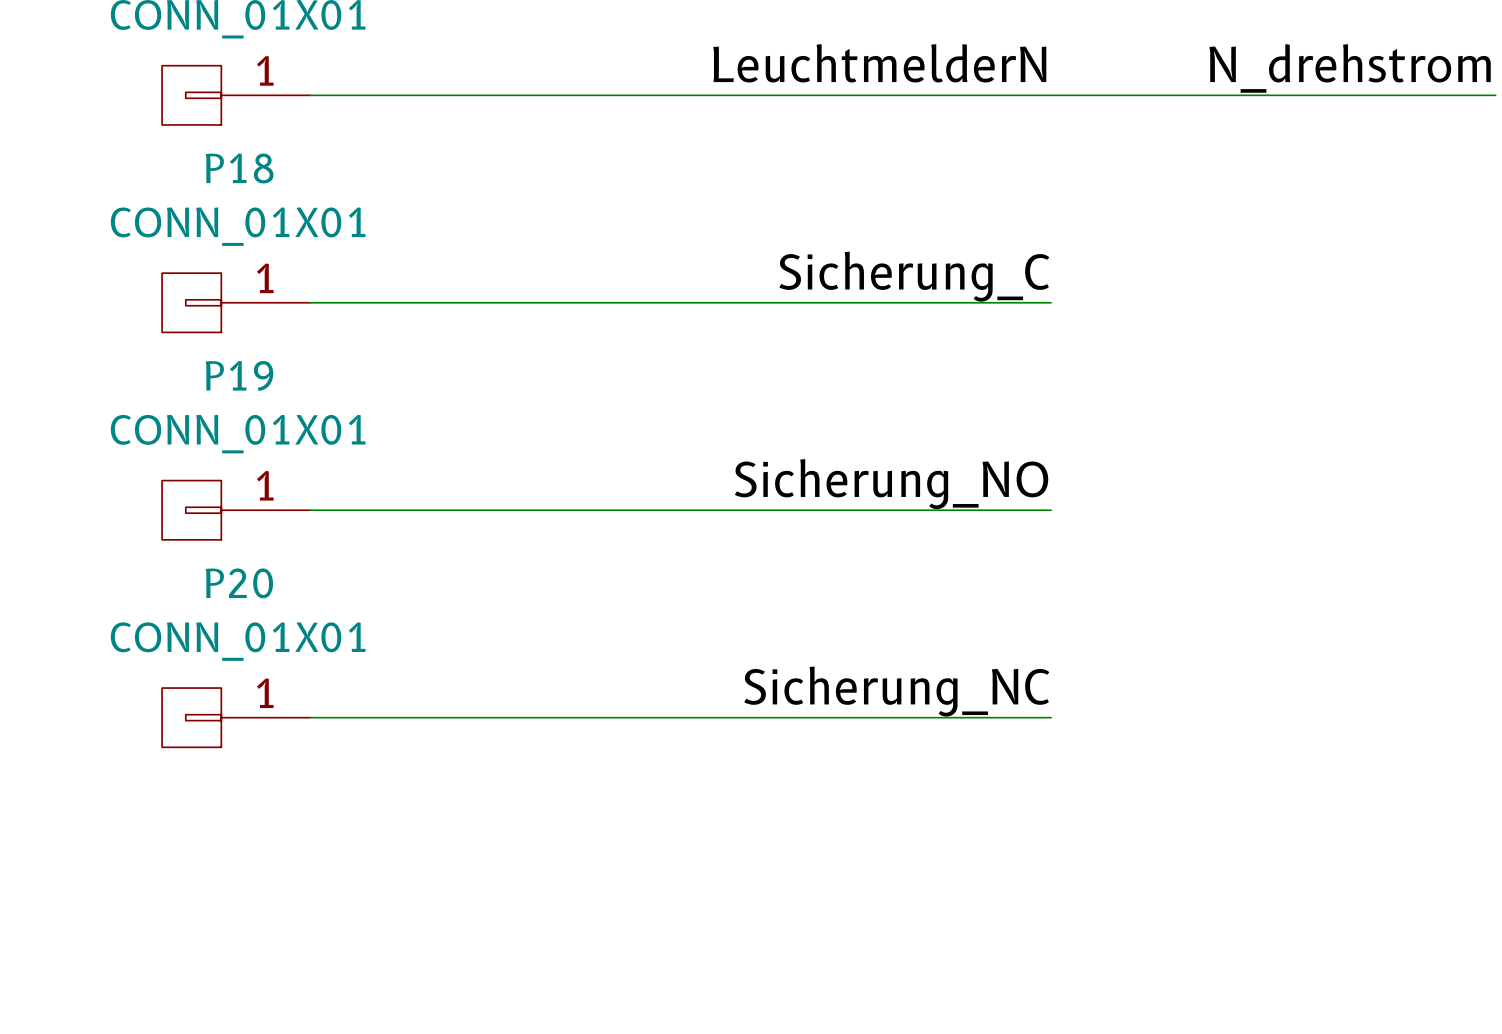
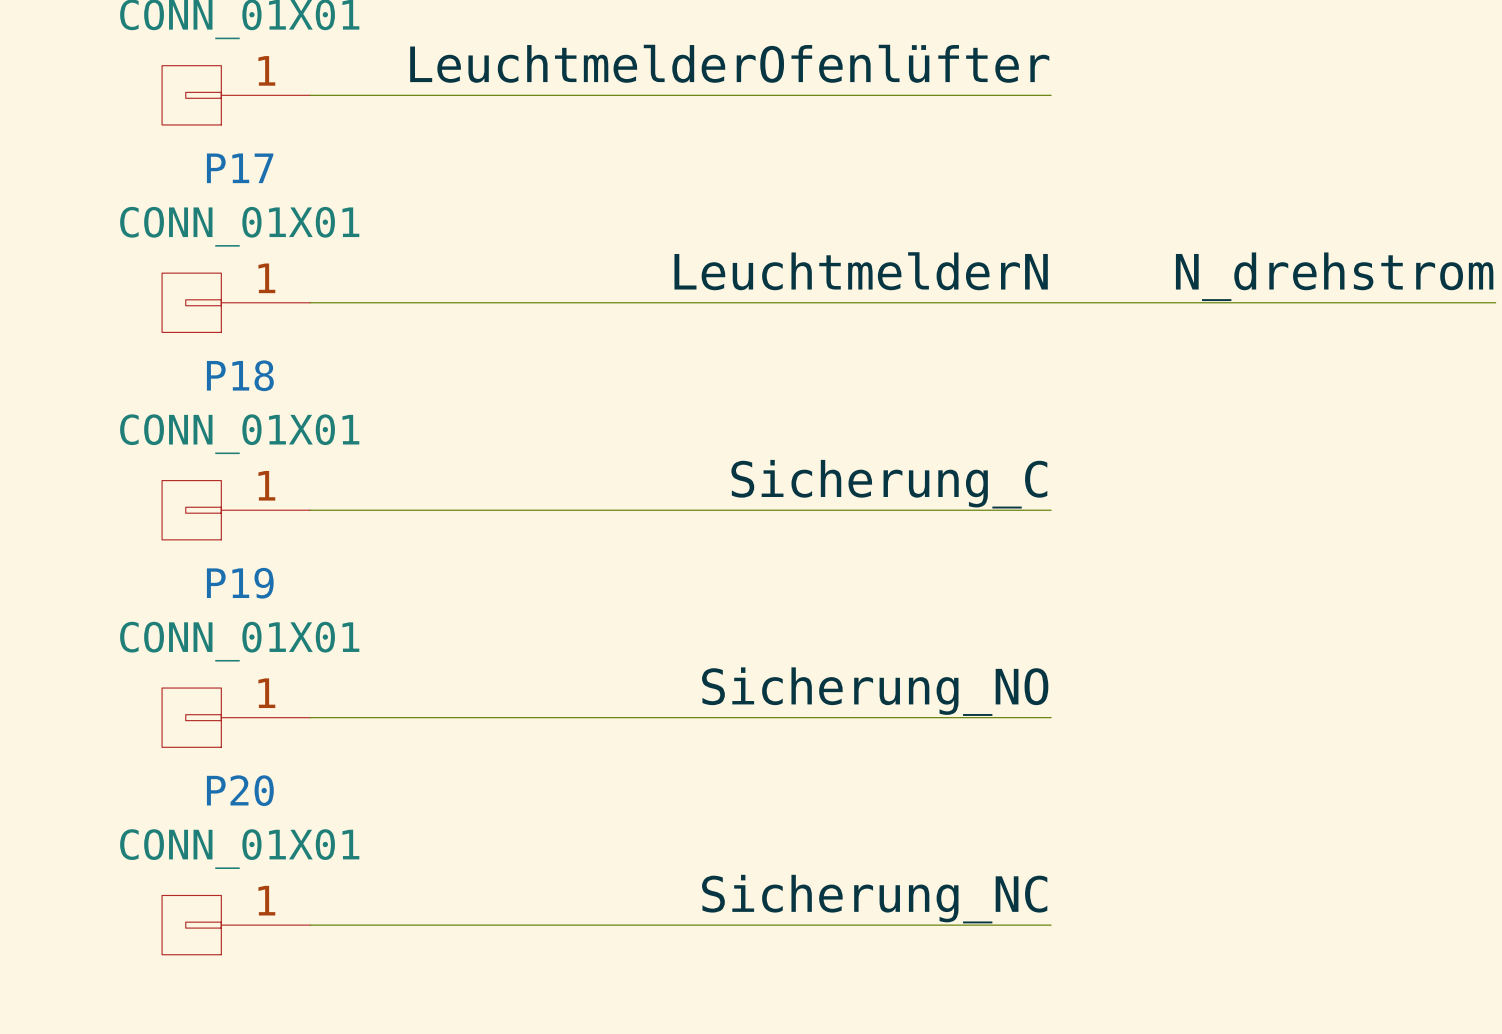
label: LeuchtmelderN (879, 63) -> LeuchtmelderOfenlüfter (729, 63)
label position: N_drehstrom (1350, 68) -> N_drehstrom (1334, 276)
wire: (1051, 95) (1495, 95) -> (1051, 302) (1495, 302)
P18 name: P18 (239, 168) -> P17 (240, 168)
label: Sicherung_C (914, 276) -> LeuchtmelderN (861, 271)
P19 name: P19 (239, 375) -> P18 (240, 375)
label: Sicherung_NO (891, 484) -> Sicherung_C (889, 484)
P20 name: P20 (239, 583) -> P19 (240, 583)
label: Sicherung_NC (896, 691) -> Sicherung_NO (875, 691)
label: none -> Sicherung_NC (874, 899)
P20: none -> CONN_01X01 (236, 925)
wire: none -> (310, 925) (1051, 925)

